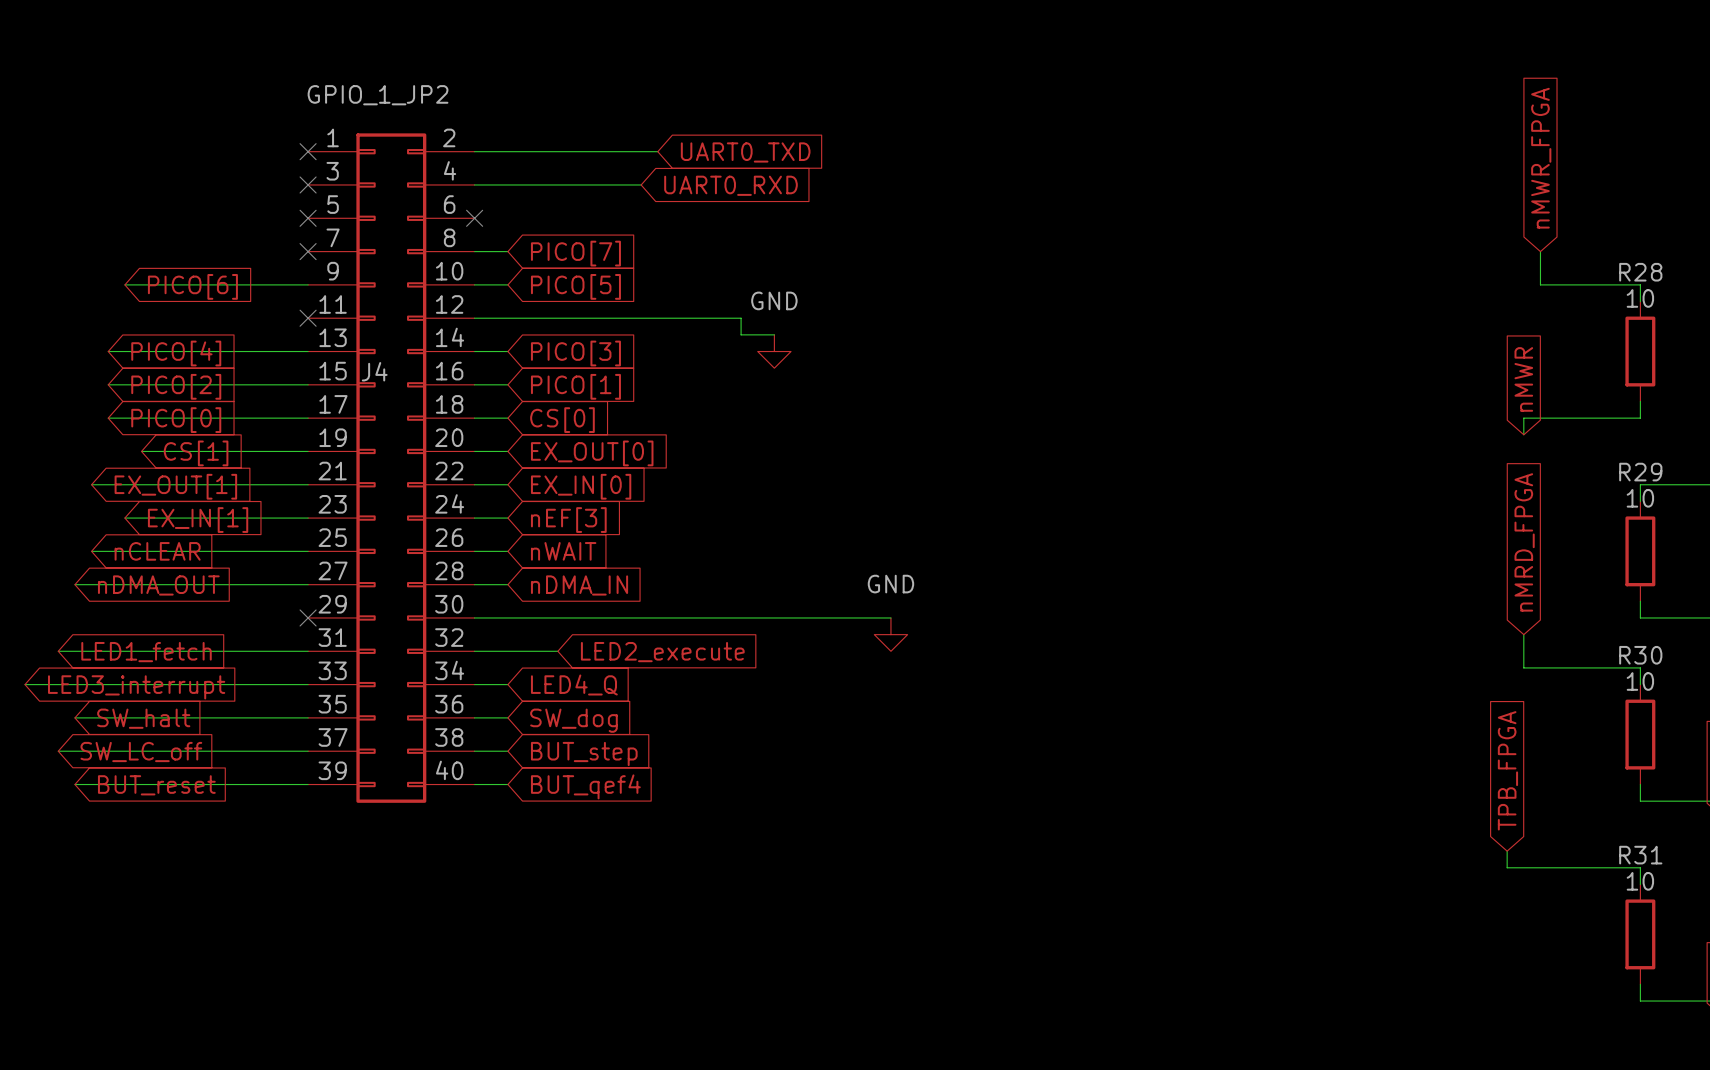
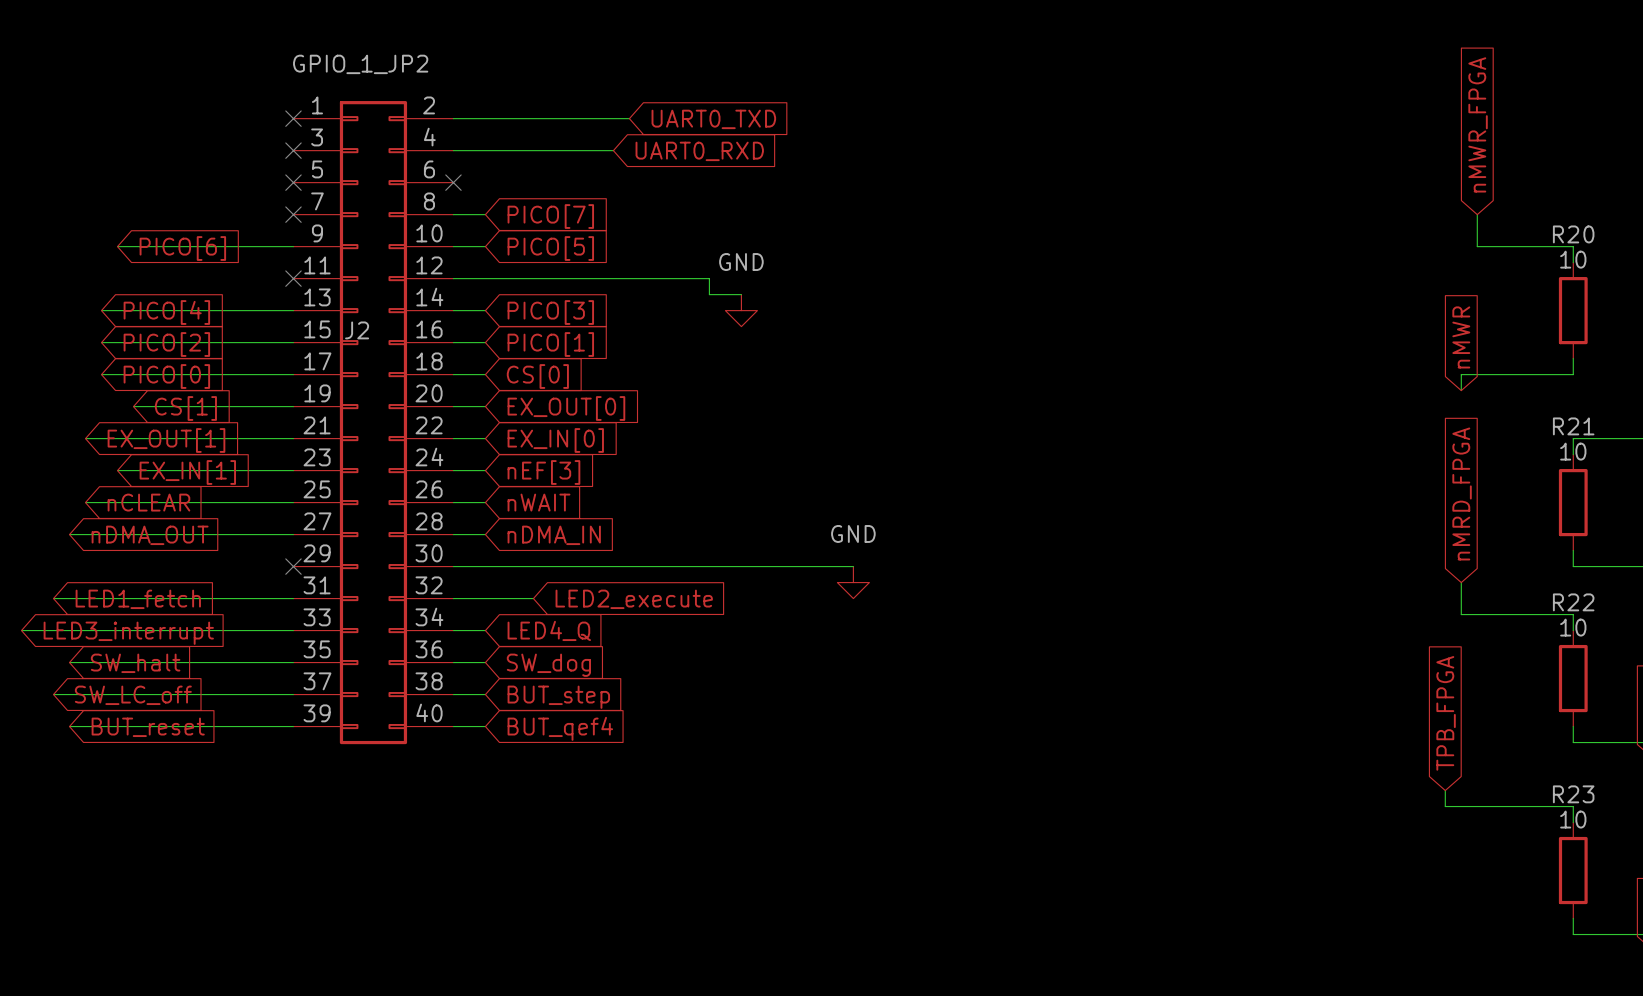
R28 name: R28 (1640, 272) -> R20 (1573, 234)
J4 name: J4 (374, 371) -> J2 (357, 330)
R29 name: R29 (1640, 472) -> R21 (1573, 426)
R30 name: R30 (1640, 655) -> R22 (1573, 602)
R31 name: R31 (1640, 855) -> R23 (1573, 794)

